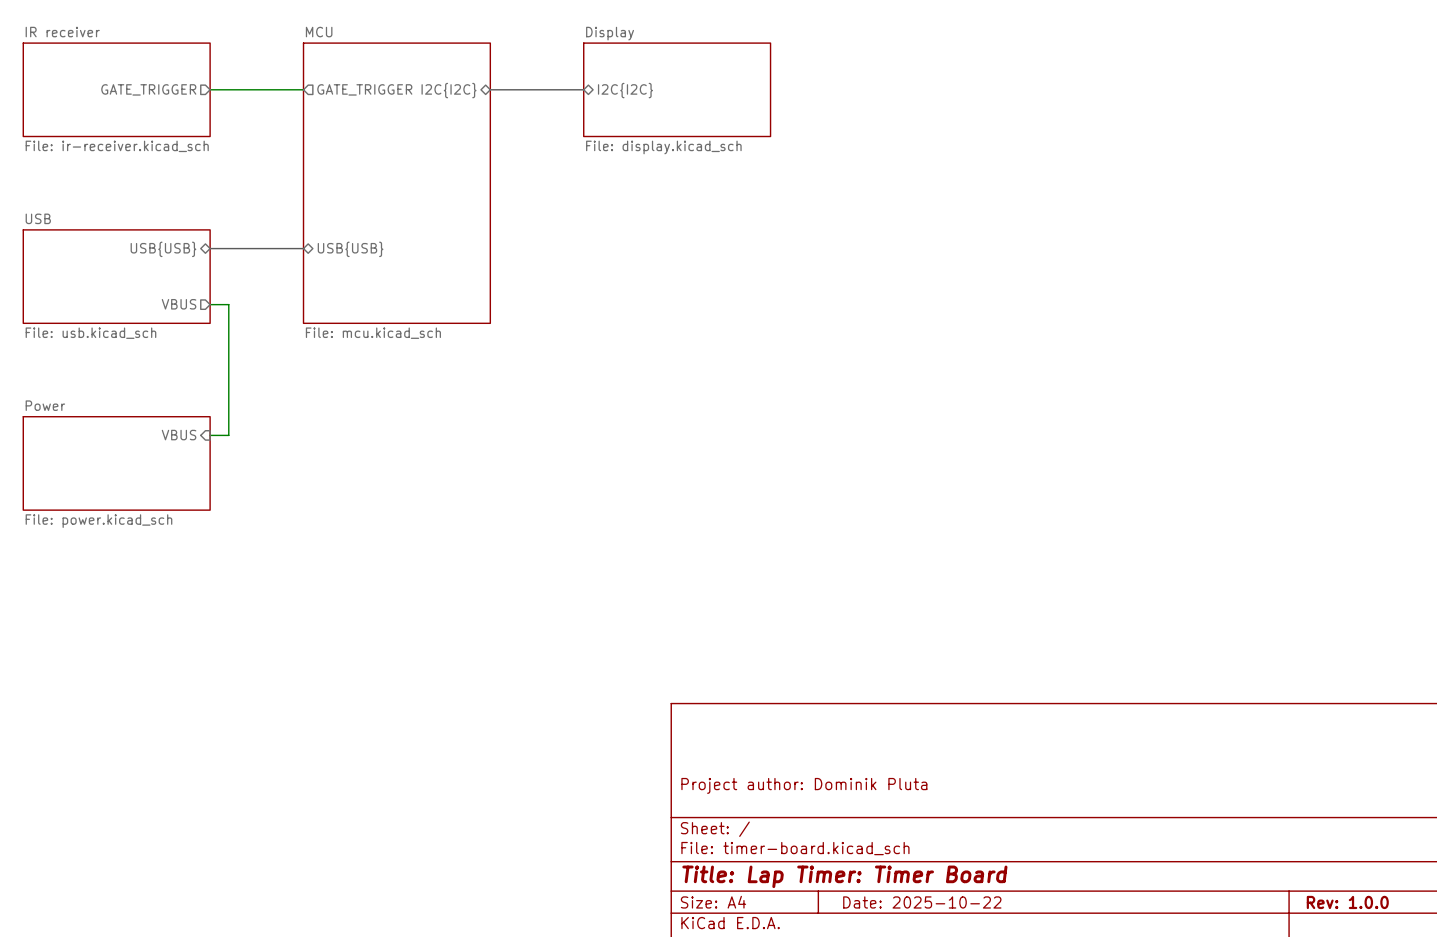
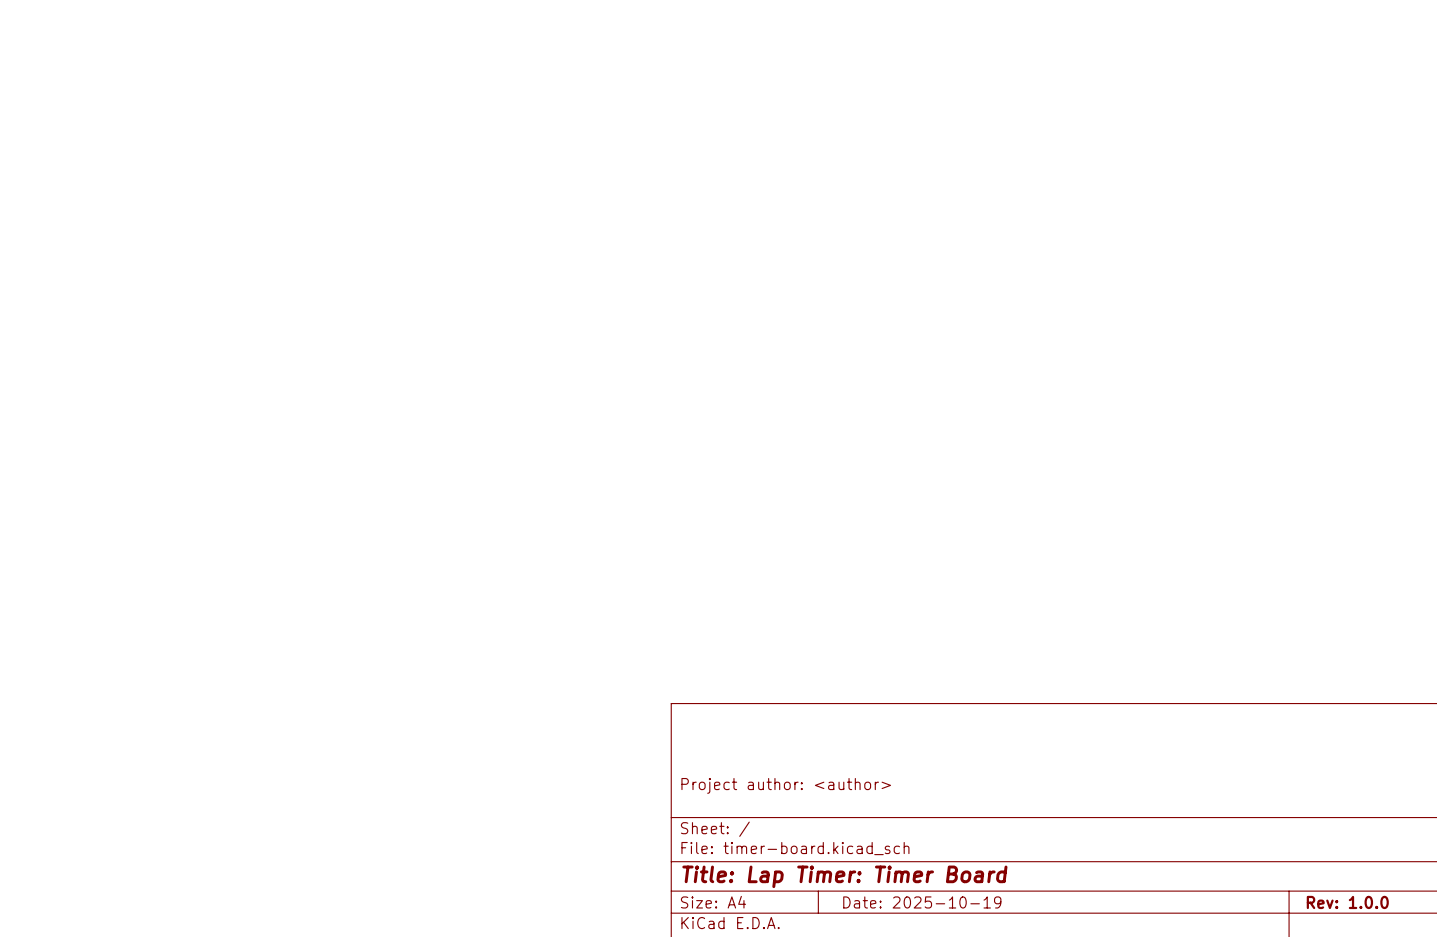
sheet IR receiver: File: ir-receiver.kicad_sch (116, 89) -> none
sheet pin: GATE_TRIGGER (148, 89) -> none
wire: (210, 89) (303, 89) -> none
sheet pin: GATE_TRIGGER (364, 89) -> none
bus: (490, 89) (583, 89) -> none
sheet Display: File: display.kicad_sch (677, 89) -> none
sheet pin: I2C{I2C} (449, 90) -> none
sheet pin: I2C{I2C} (625, 90) -> none
sheet MCU: File: mcu.kicad_sch (396, 183) -> none
bus: (210, 248) (303, 248) -> none
sheet pin: USB{USB} (163, 249) -> none
sheet pin: USB{USB} (350, 249) -> none
sheet USB: File: usb.kicad_sch (116, 276) -> none
sheet pin: VBUS (179, 304) -> none
wire: (210, 304) (228, 304) (228, 435) (210, 435) -> none
sheet pin: VBUS (179, 435) -> none
sheet Power: File: power.kicad_sch (116, 463) -> none
title block: Project author: Dominik Pluta (804, 785) -> Project author: <author> (786, 785)
title block: Date: 2025-10-22 (922, 902) -> Date: 2025-10-19 (922, 902)

